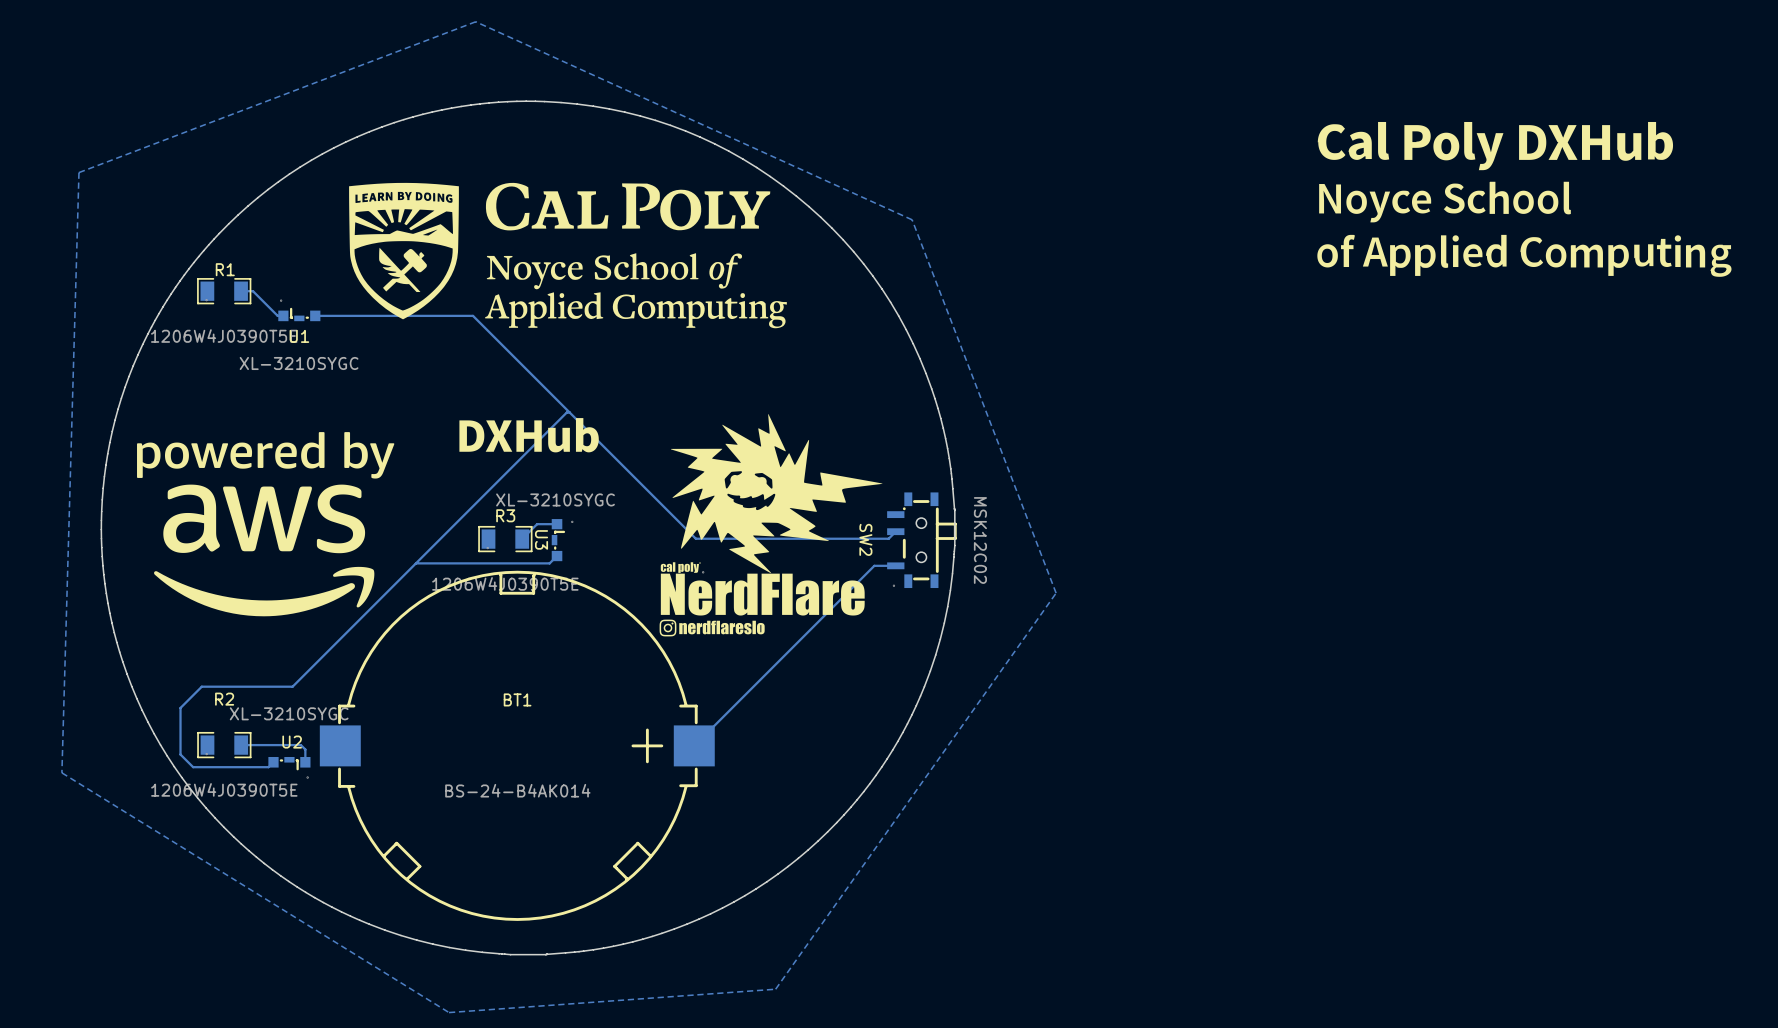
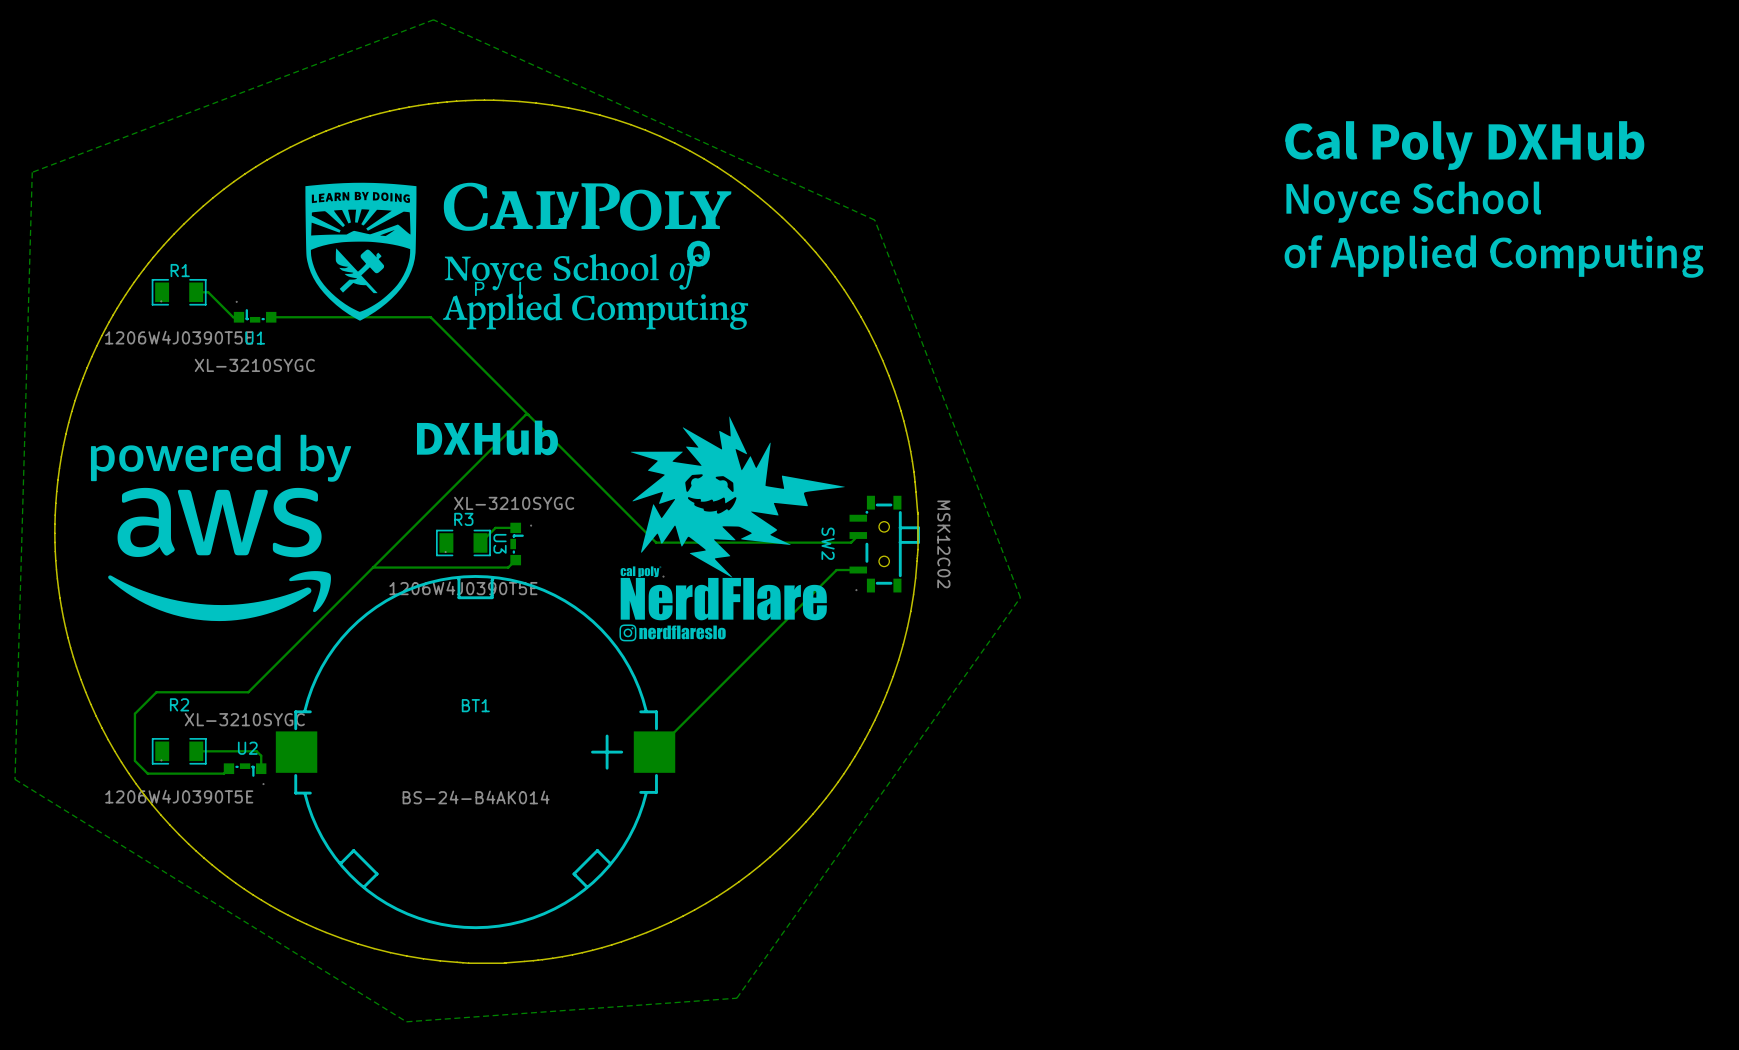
drawing: none -> [556, 191, 579, 224]
drawing: none -> [687, 240, 710, 267]
drawing: none -> [474, 281, 485, 297]
drawing: none -> [519, 281, 522, 296]

